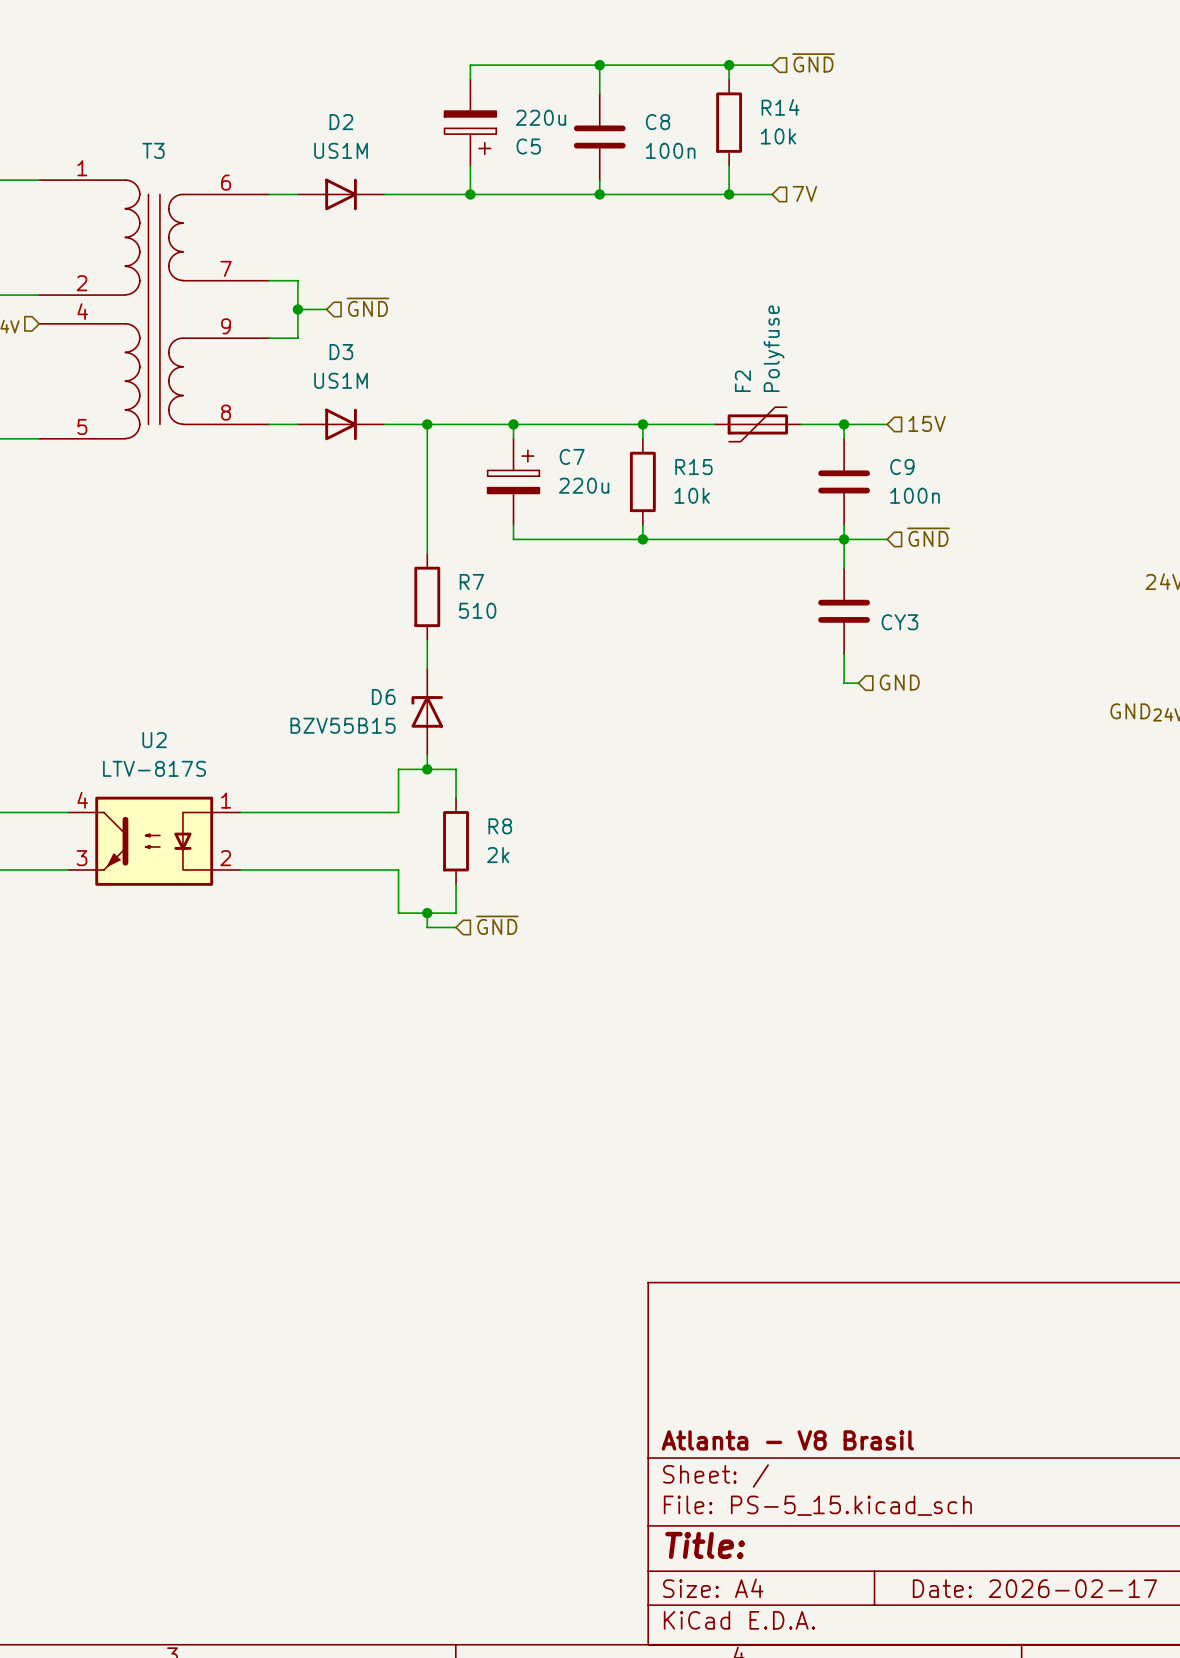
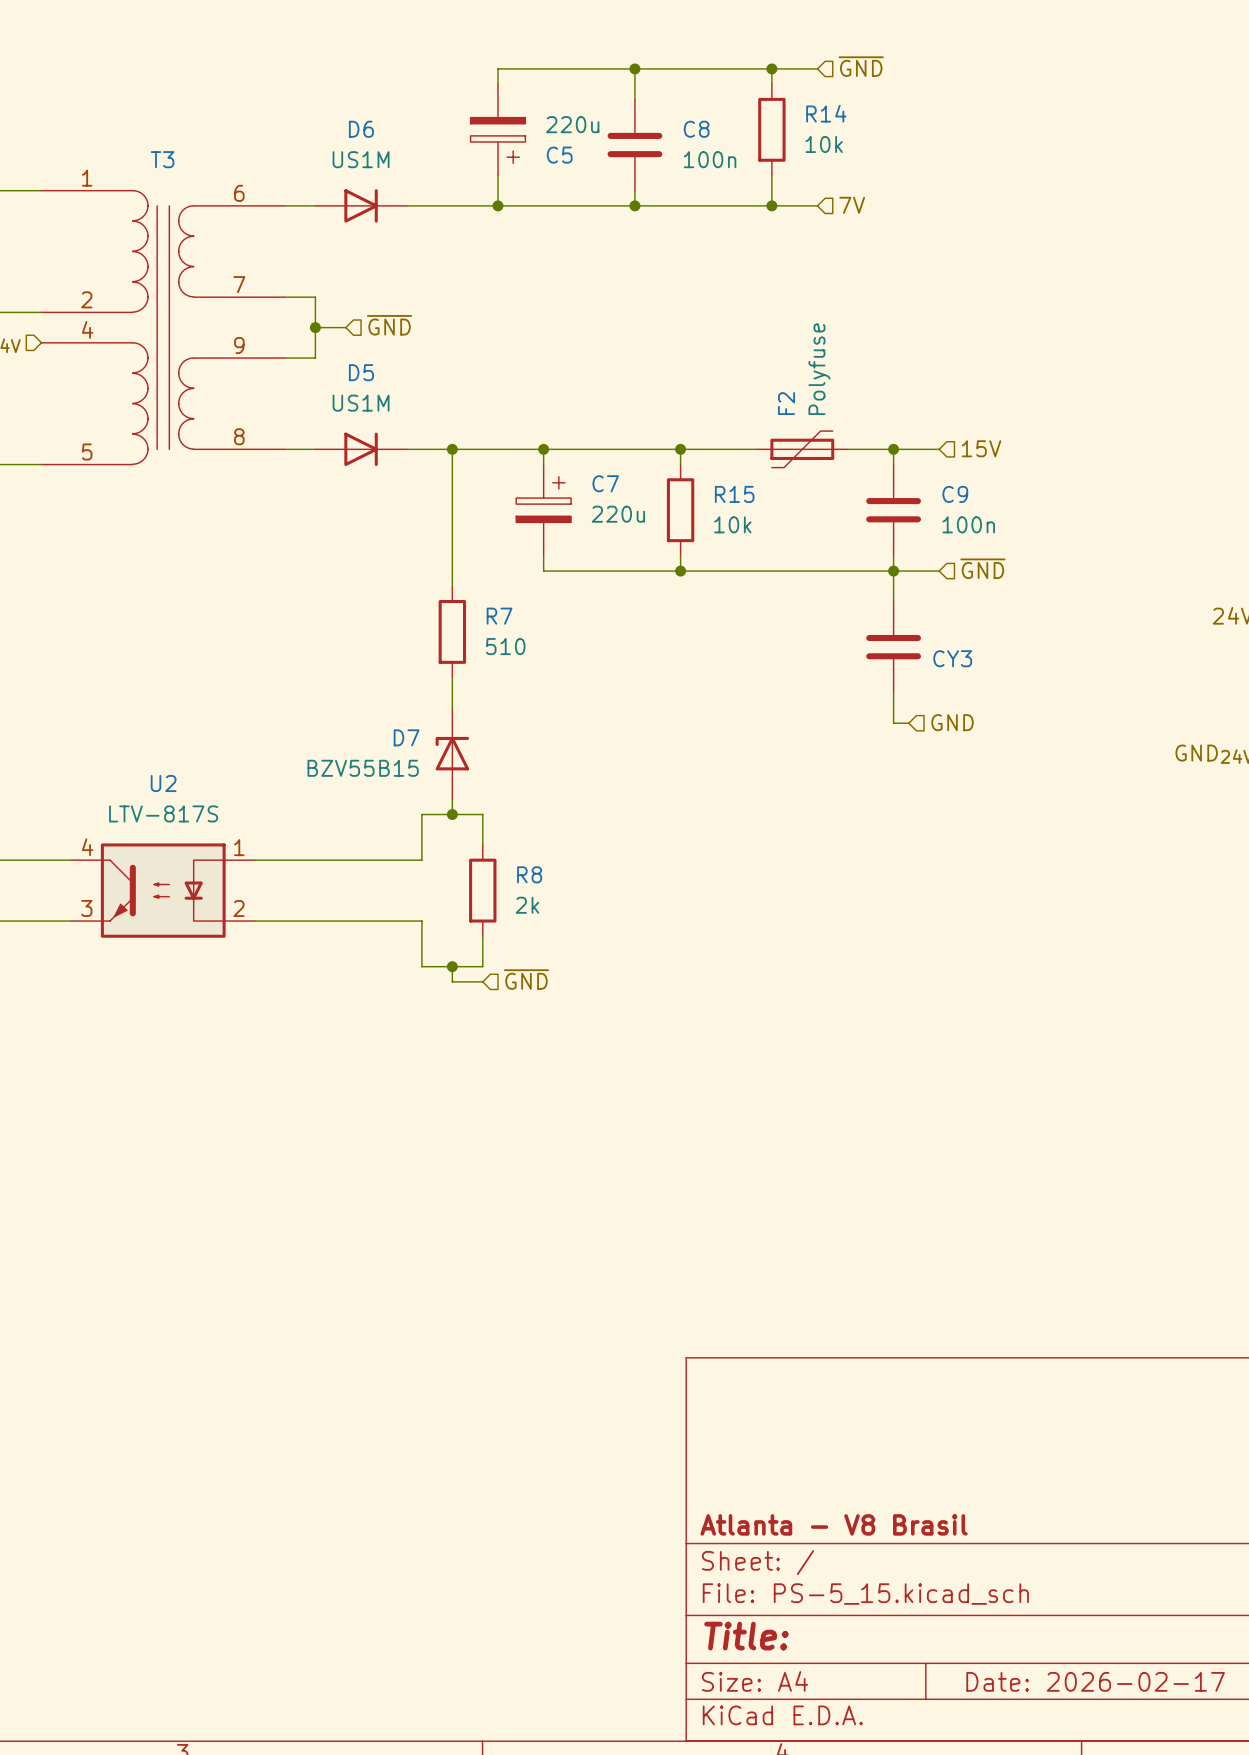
D2 name: D2 (341, 122) -> D6 (361, 129)
D3 name: D3 (341, 352) -> D5 (361, 372)
D6 name: D6 (383, 696) -> D7 (406, 737)

